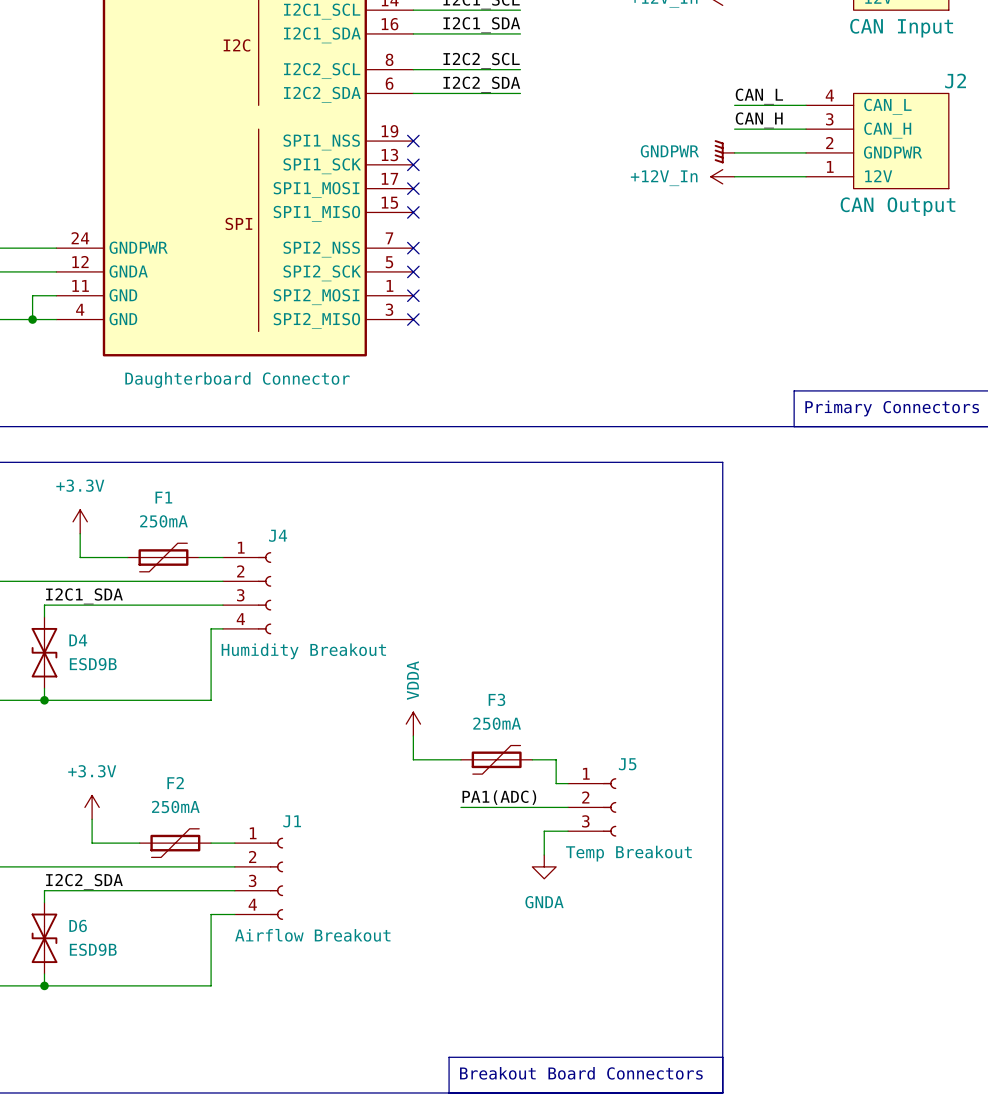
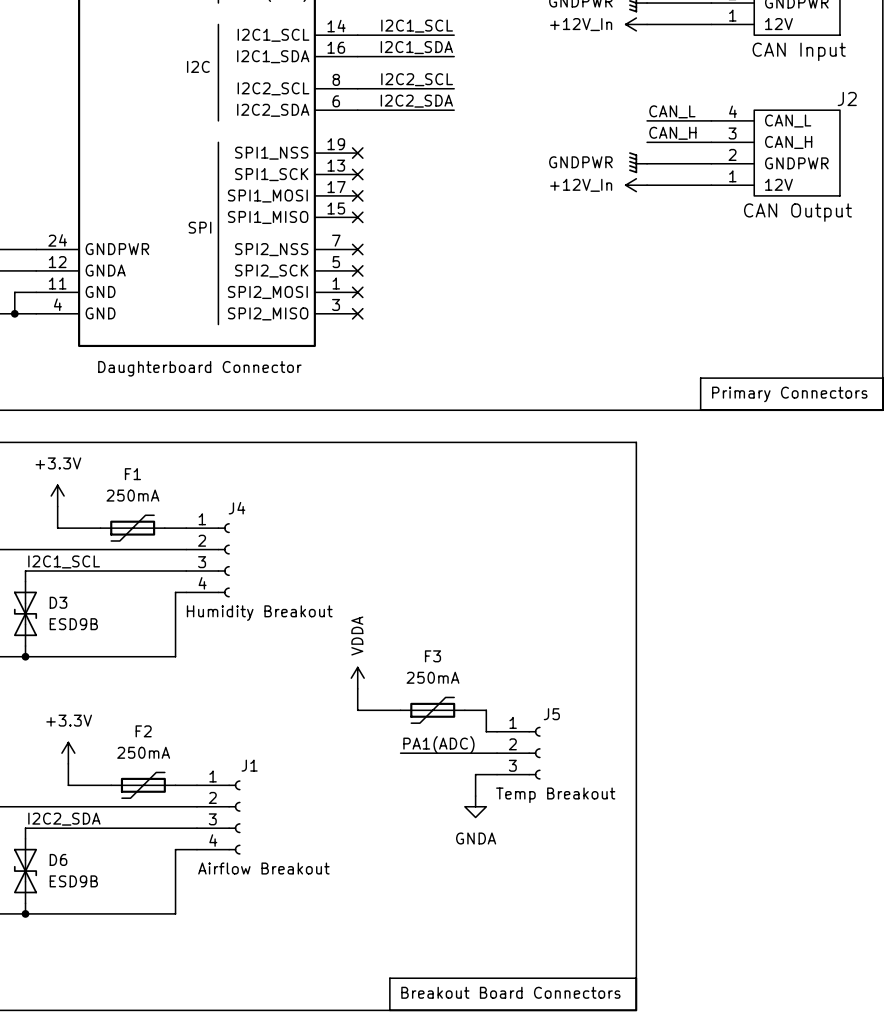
label: I2C1_SDA (84, 596) -> I2C1_SCL (64, 561)
D4 name: D4 (78, 640) -> D3 (58, 602)

